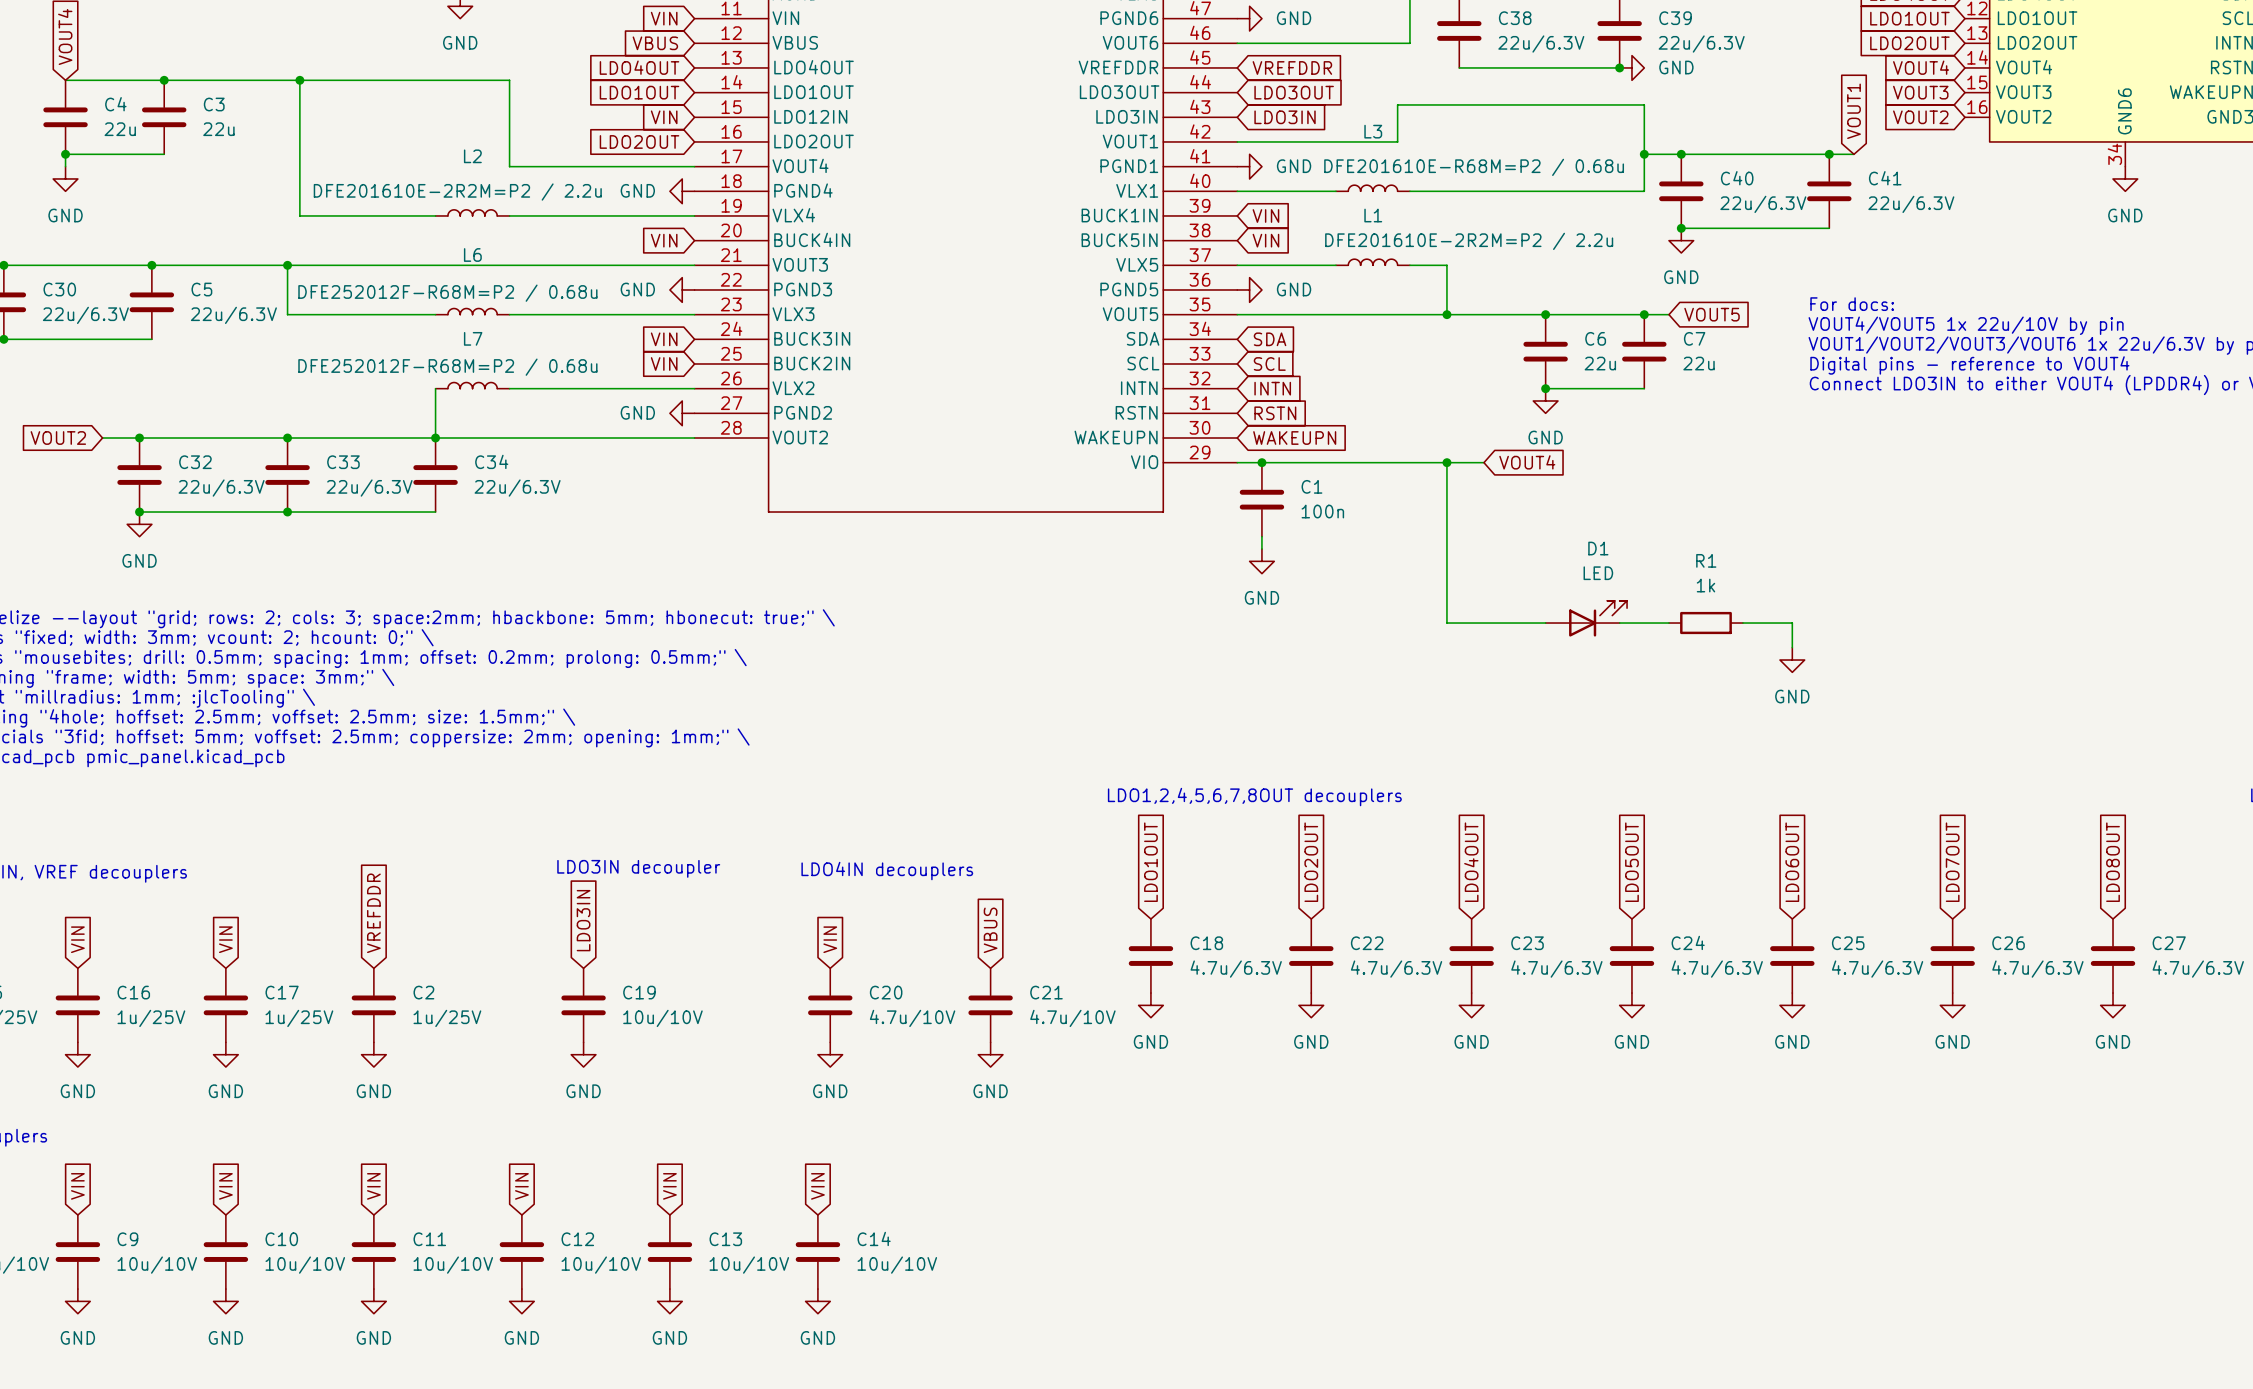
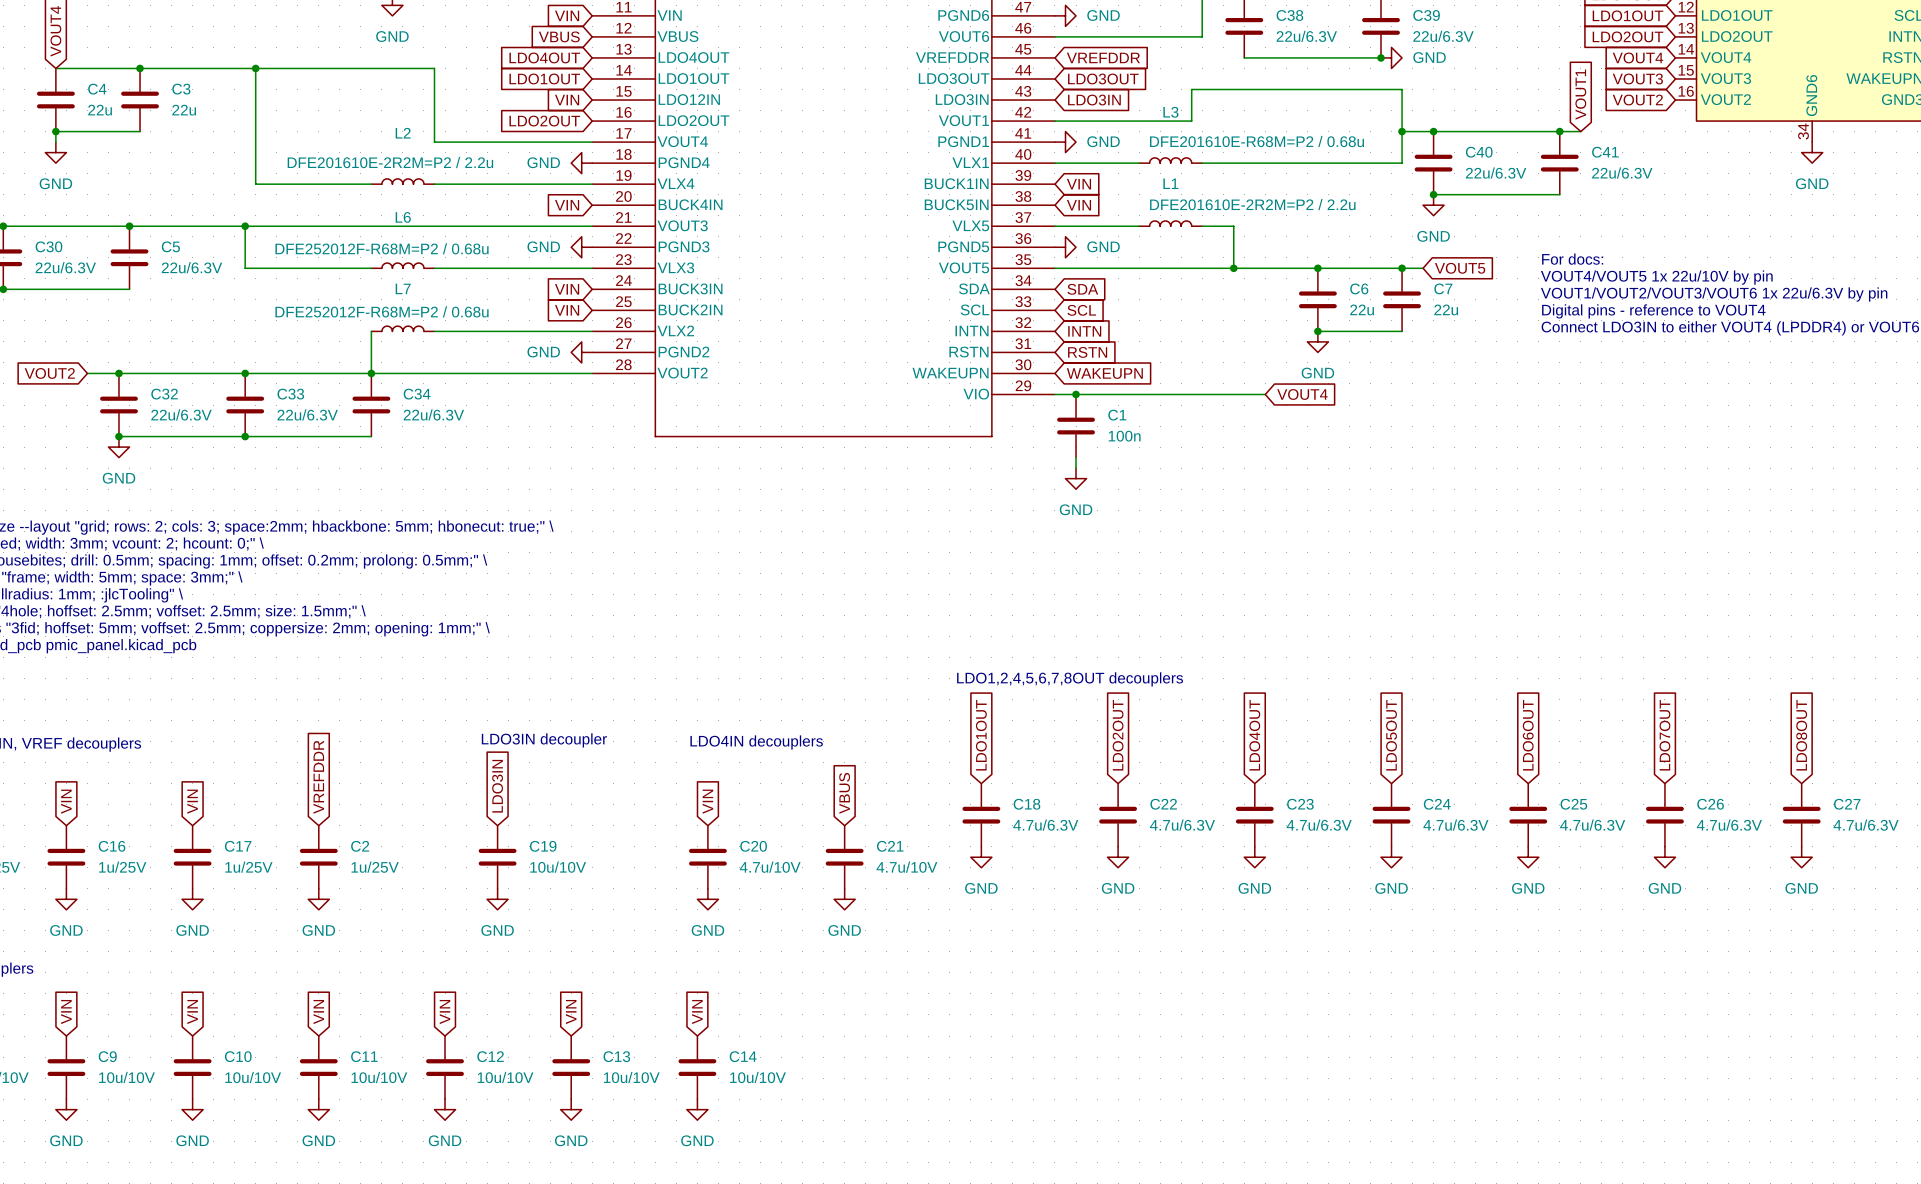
wire: (1446, 462) (1446, 623) (1545, 623) -> none
junction: (1446, 462) -> none
D1: LED (1586, 618) -> none
wire: (1619, 623) (1668, 623) -> none
R1: 1k (1705, 623) -> none
wire: (1742, 623) (1792, 623) (1792, 647) -> none
power symbol: GND (1792, 660) -> none

